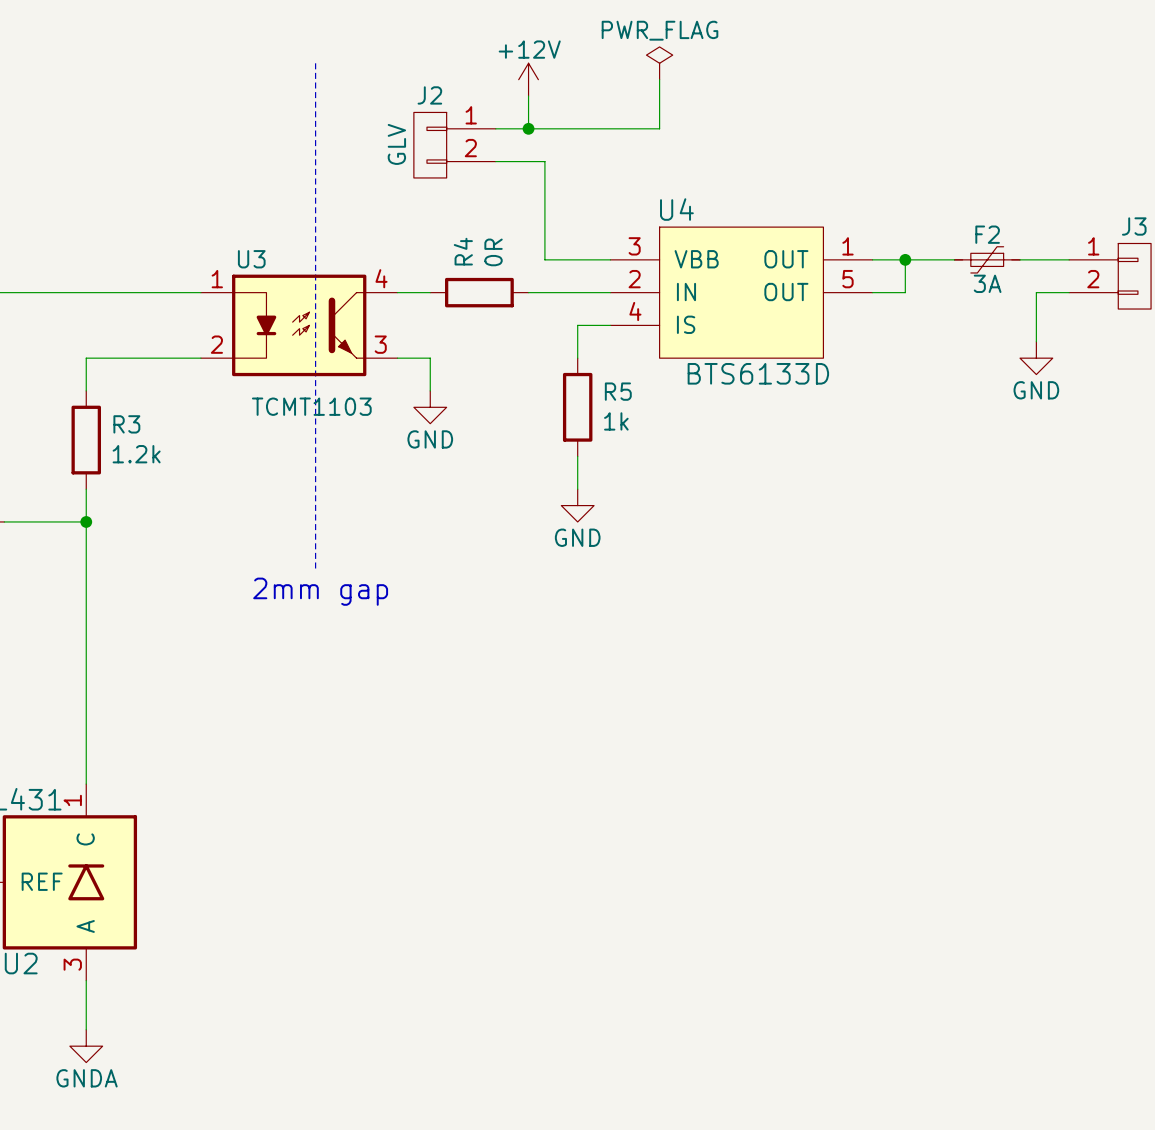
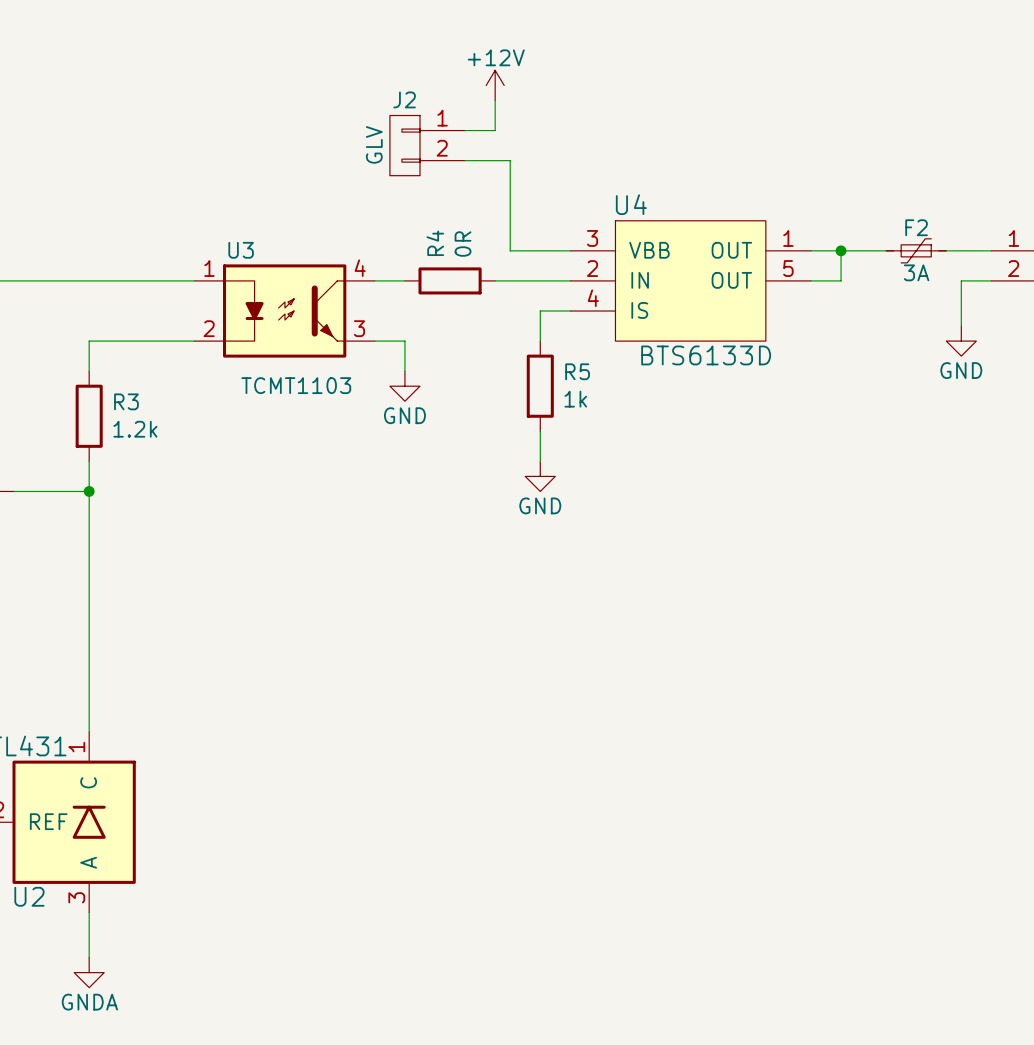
line: (315, 63) (315, 571) -> none
power symbol: PWR_FLAG (659, 63) -> none
wire: (659, 79) (659, 128) (528, 128) -> none
junction: (528, 128) -> none
text: 2mm gap (320, 591) -> none

